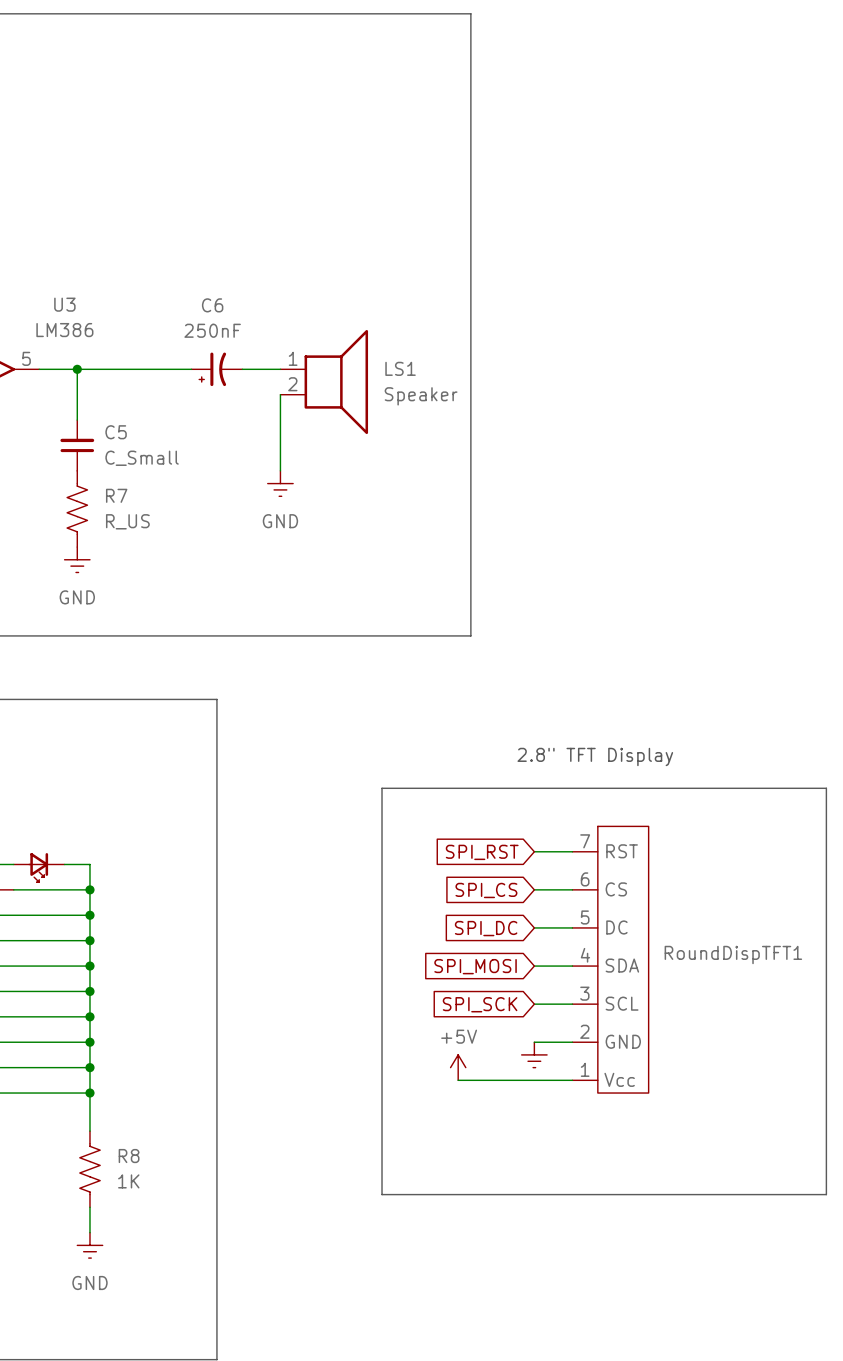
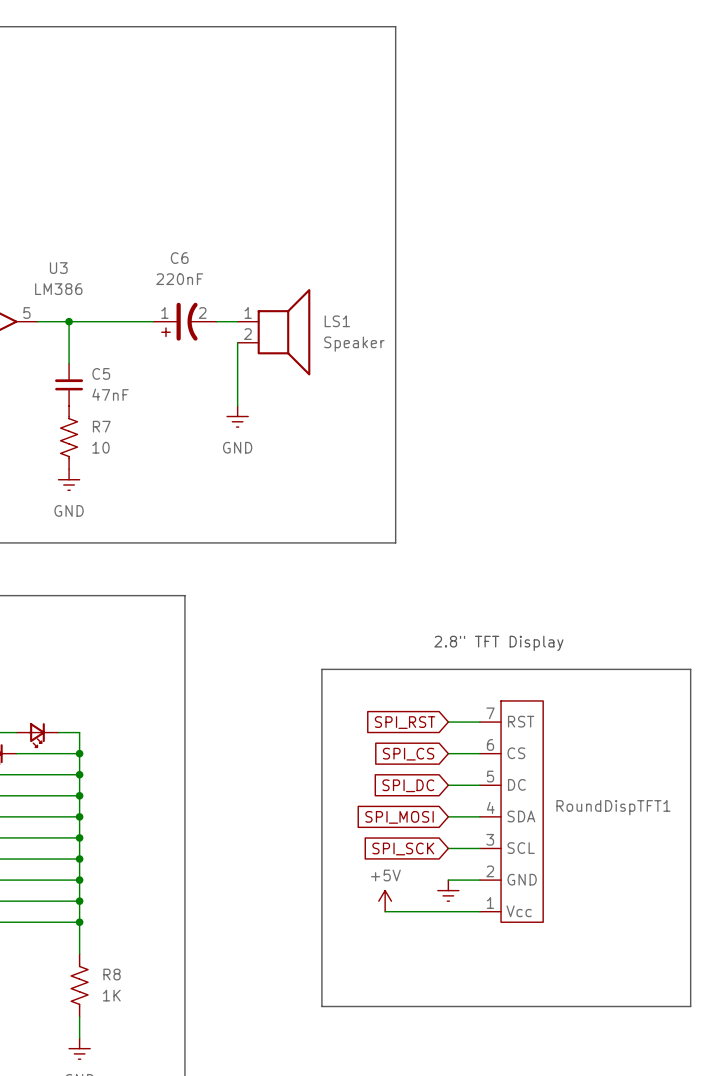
C6 value: 250nF (212, 330) -> 220nF (179, 279)
C6 symbol: [191, 352, 243, 387] -> [153, 302, 217, 341]
C5 value: C_Small (142, 458) -> 47nF (110, 394)
R7 value: R_US (127, 521) -> 10 (101, 447)

